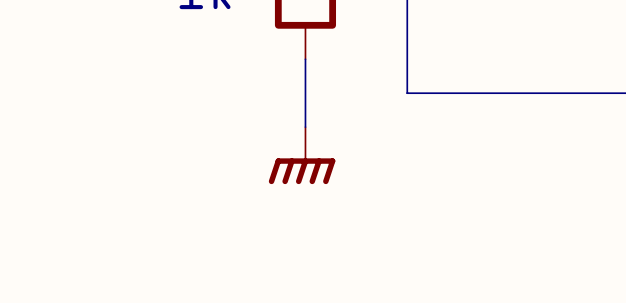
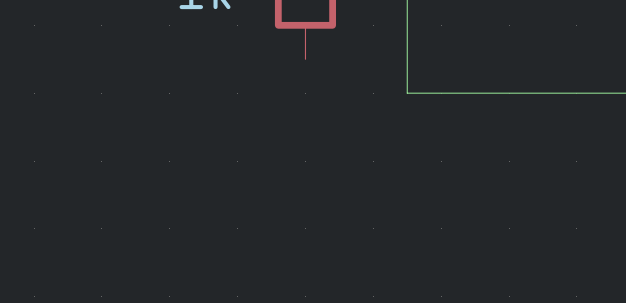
wire: (305, 59) (305, 127) -> none
power symbol: (302, 155) -> none

